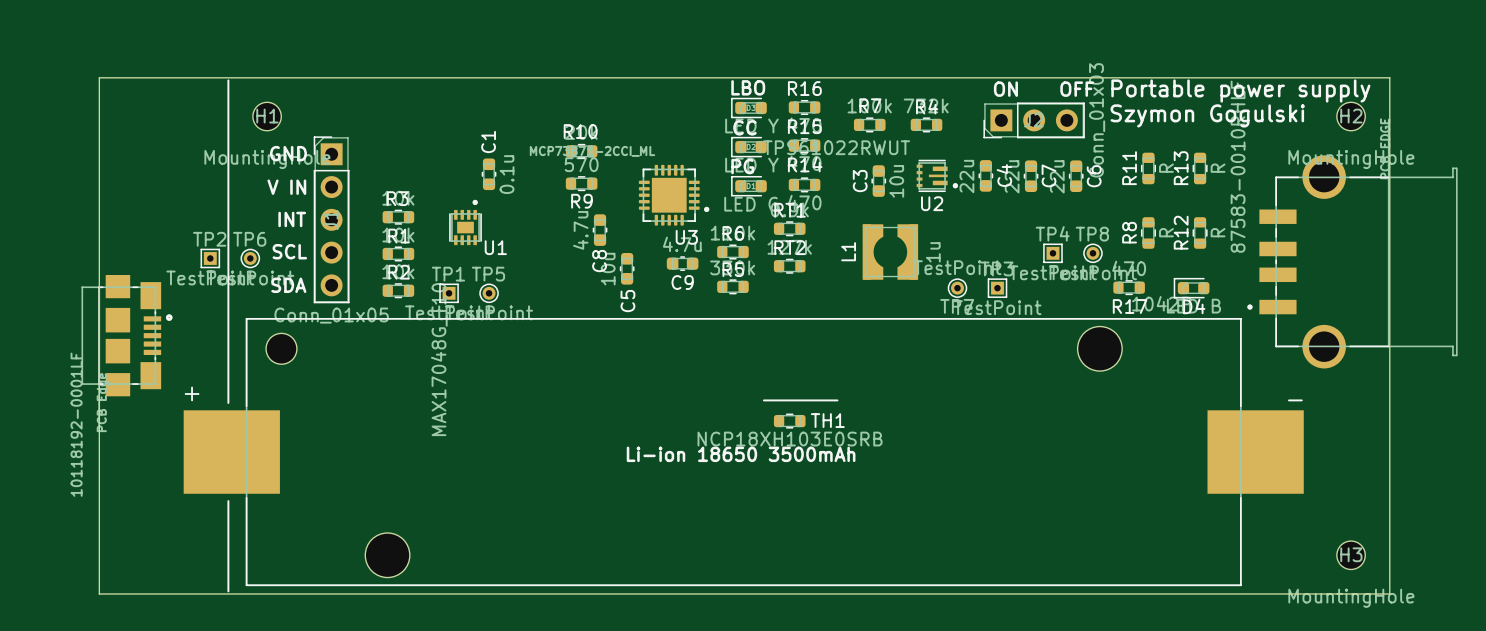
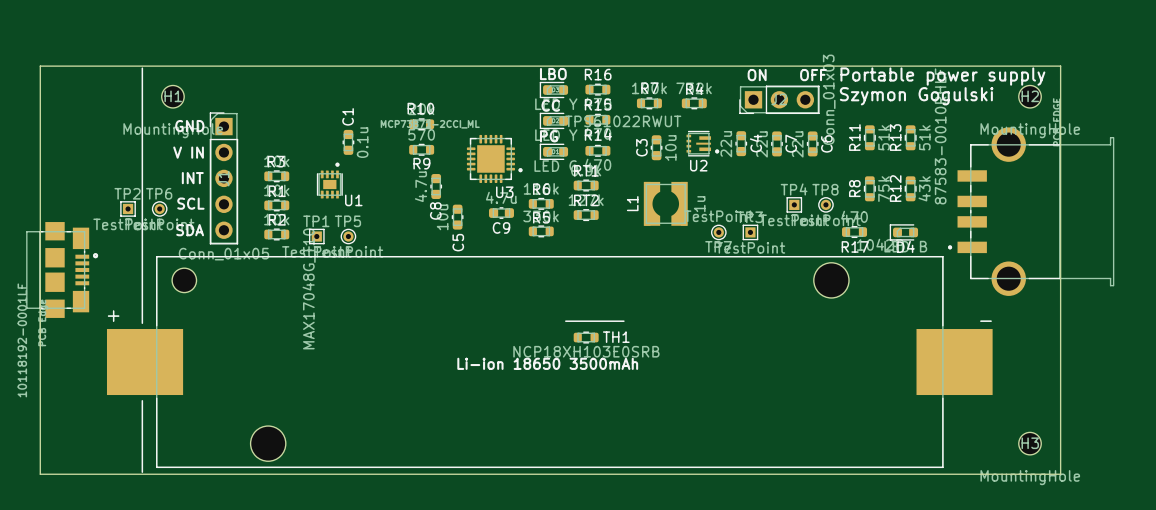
R11 value: R (1166, 168) -> 51k (884, 137)
R13 value: R (1218, 168) -> 51k (924, 137)
R8 value: R (1166, 232) -> 75k (884, 189)
R12 value: R (1218, 232) -> 43k (924, 188)

